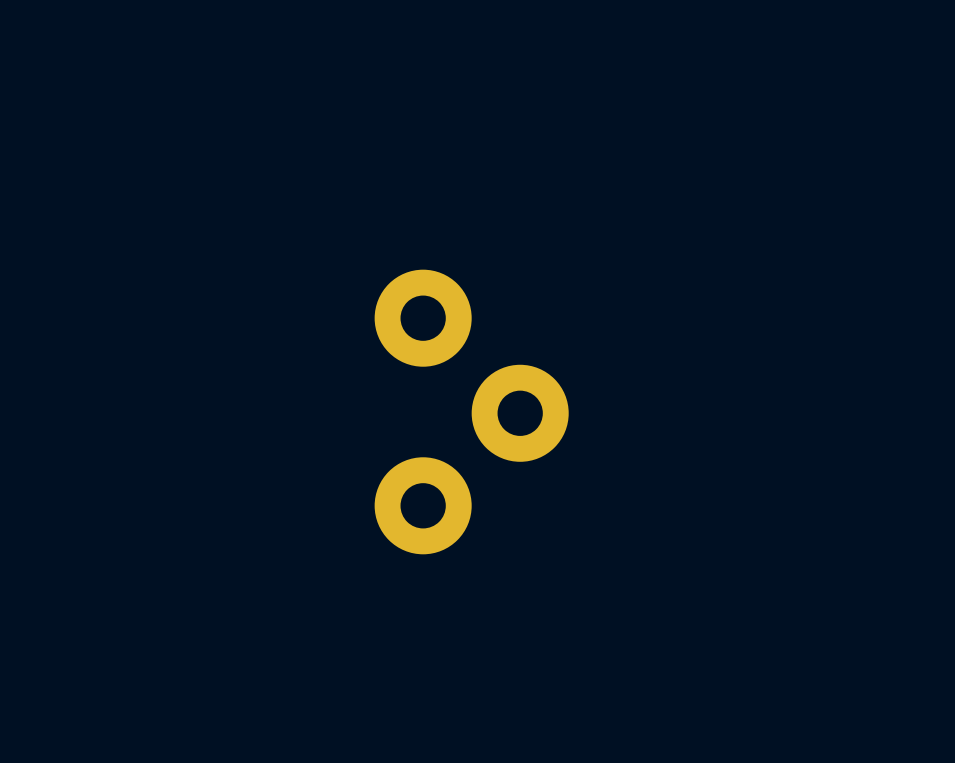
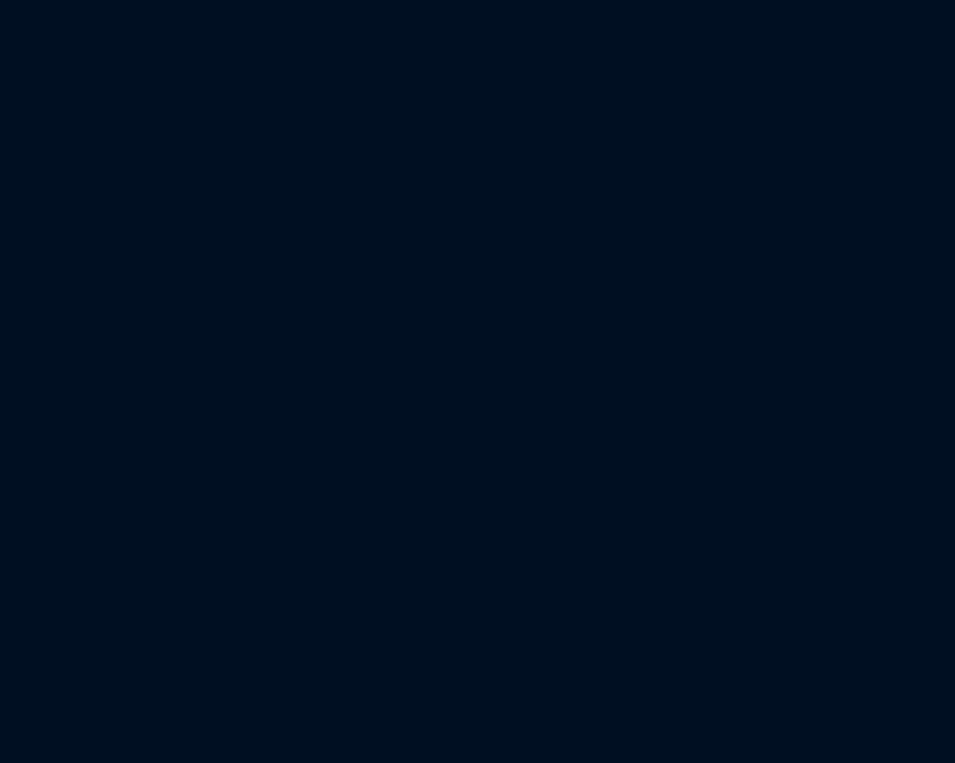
part: (471, 412) -> none

